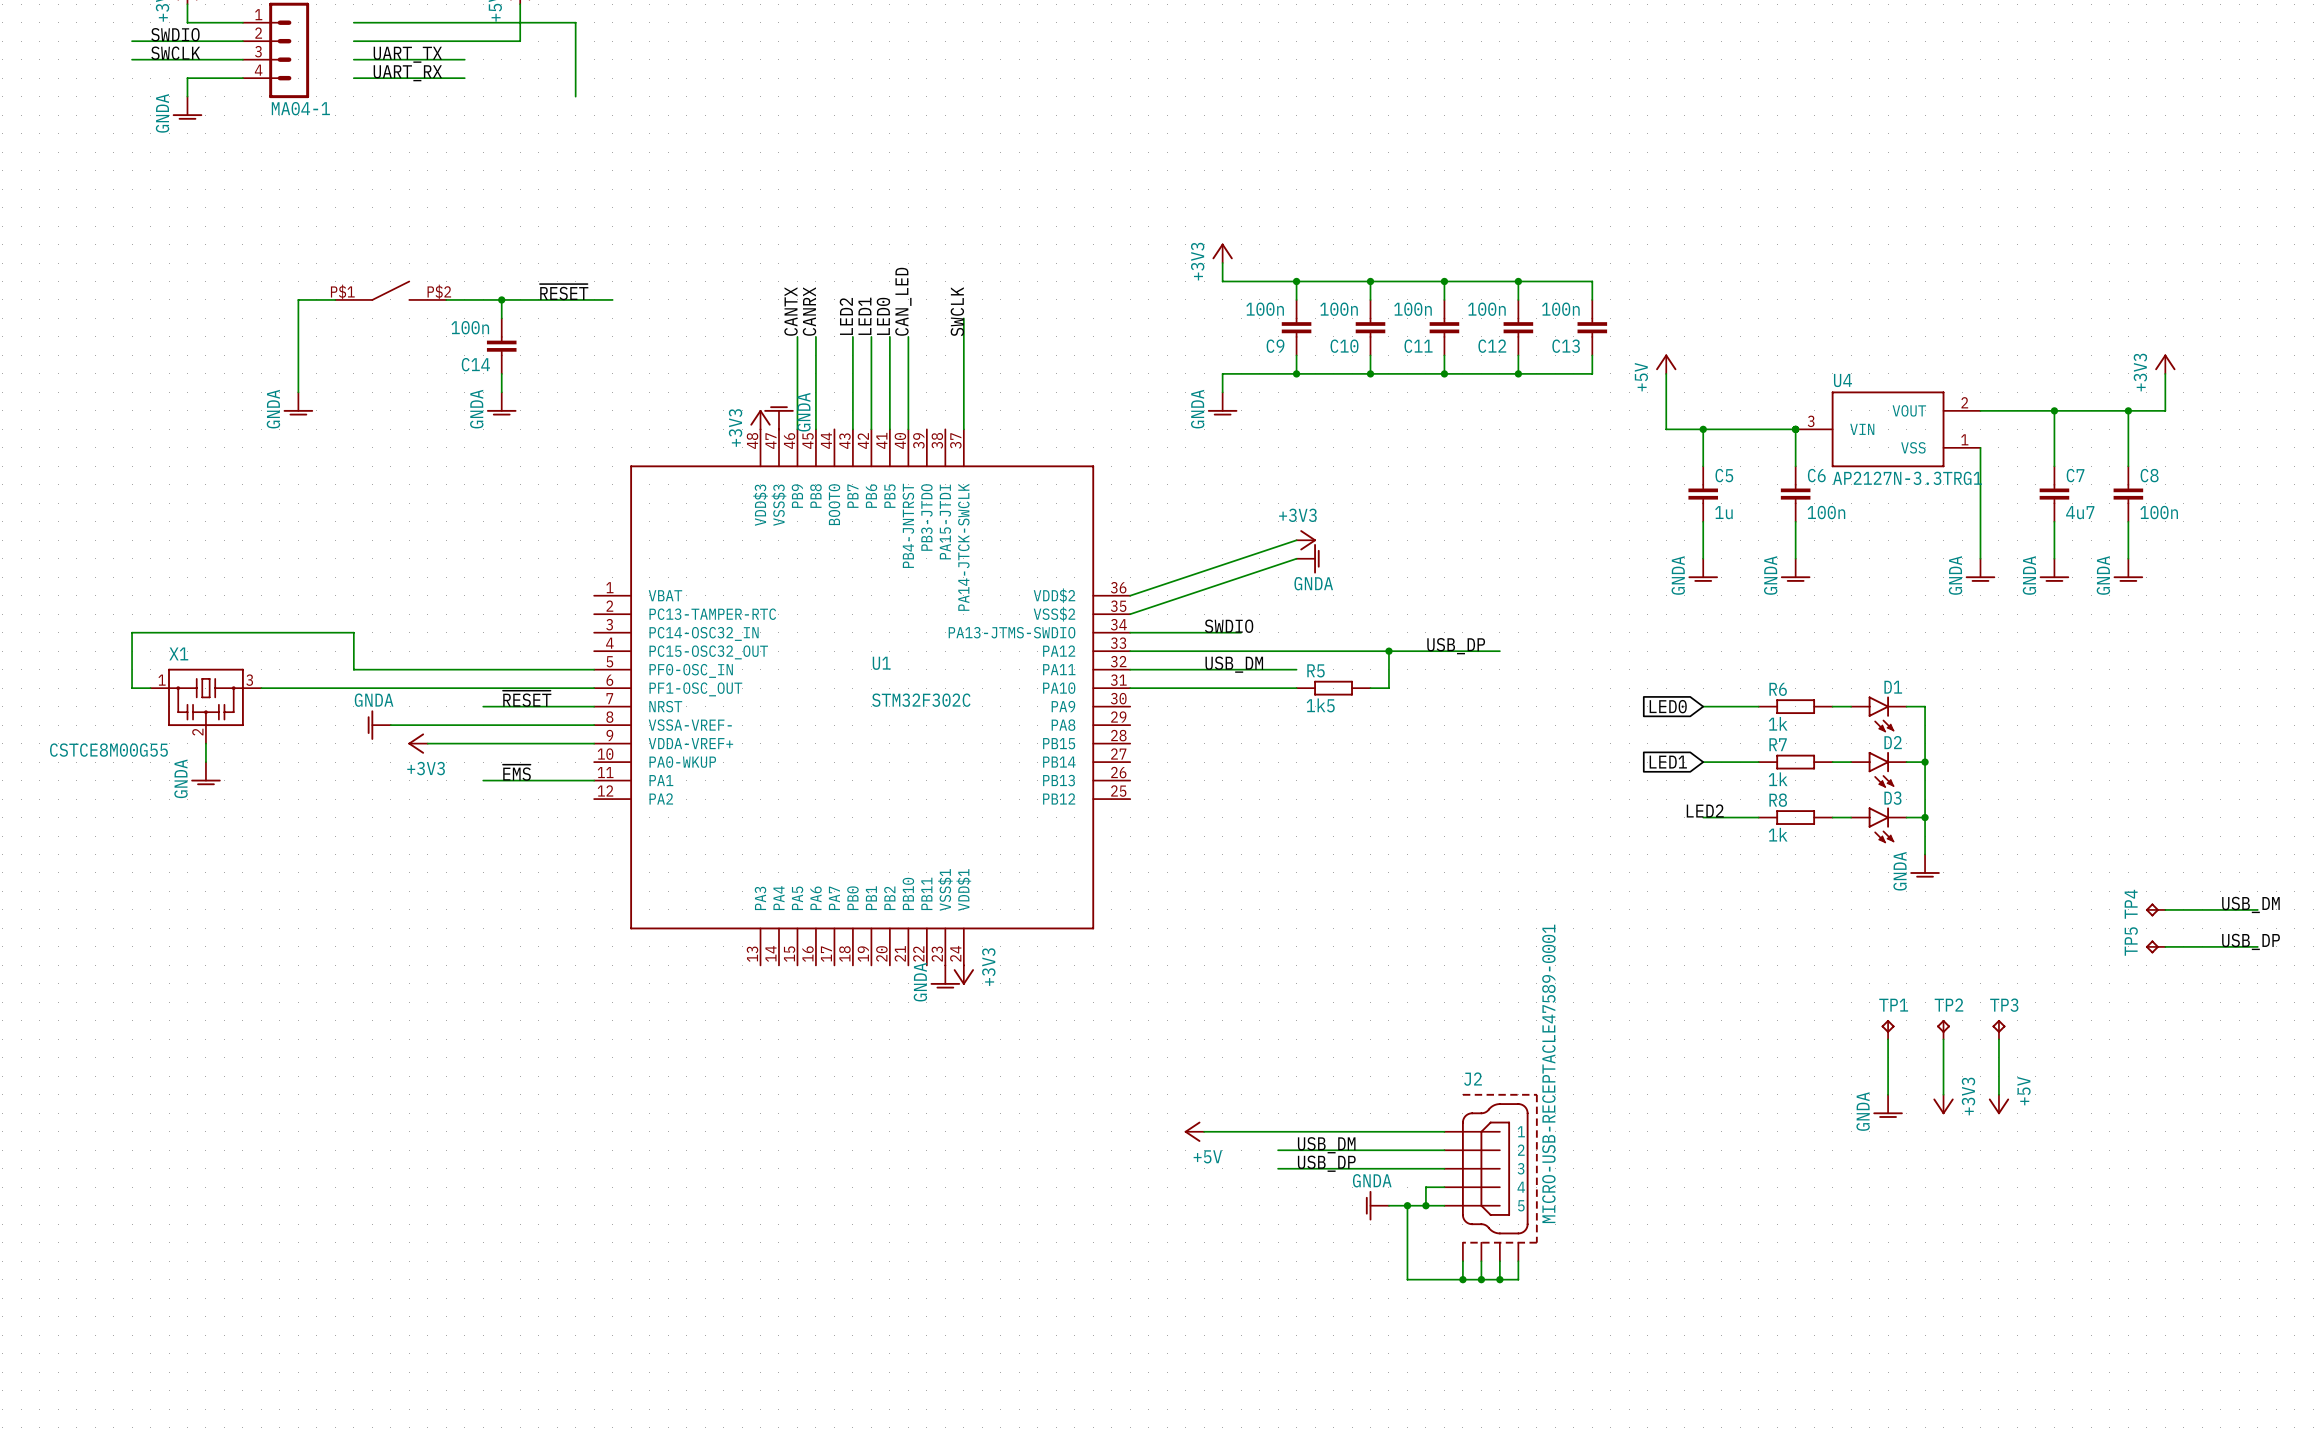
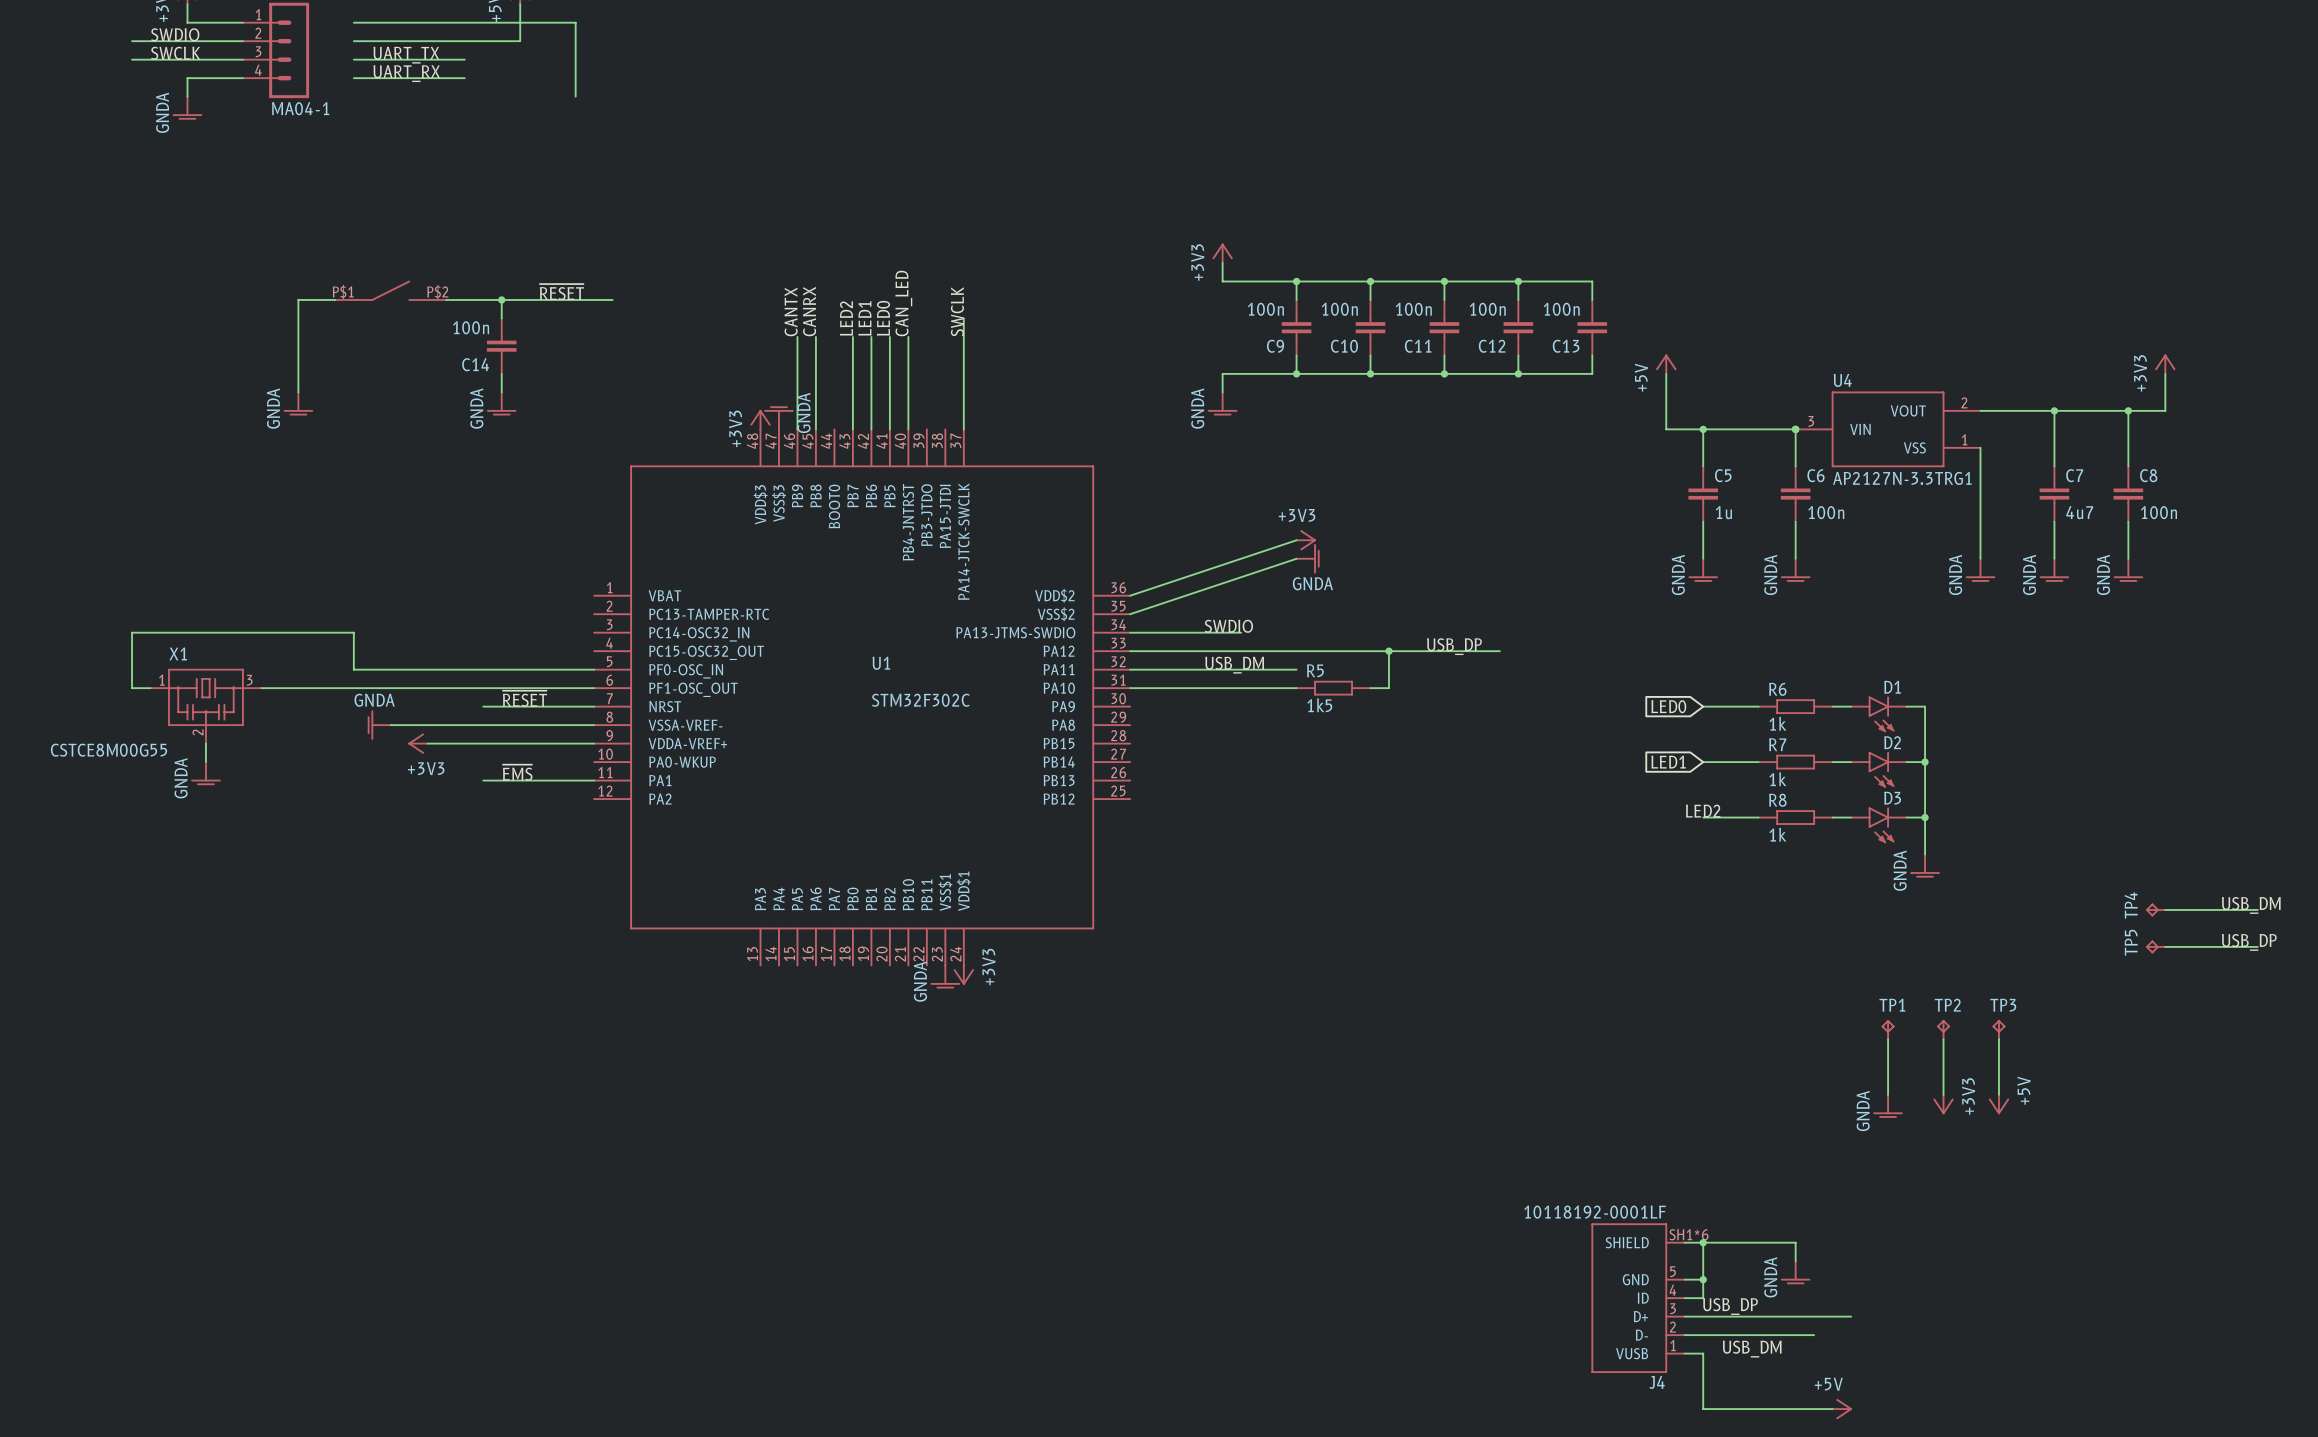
power symbol: +5V (1194, 1131) -> none
wire: (1204, 1131) (1444, 1131) -> none
label: USB_DM (1326, 1145) -> none
wire: (1278, 1150) (1444, 1150) -> none
label: USB_DP (1326, 1163) -> none
wire: (1278, 1168) (1444, 1168) -> none
J2: MICRO-USB-RECEPTACLE47589-0001 (1491, 1177) -> none
wire: (1444, 1187) (1425, 1187) (1425, 1205) -> none
power symbol: GNDA (1377, 1205) -> none
wire: (1388, 1205) (1444, 1205) -> none
wire: (1407, 1205) (1407, 1279) (1518, 1279) (1518, 1261) -> none
junction: (1407, 1205) -> none
junction: (1425, 1205) -> none
wire: none -> (1684, 1242) (1795, 1242) (1795, 1261)
wire: none -> (1703, 1242) (1703, 1298) (1684, 1298)
junction: none -> (1703, 1242)
wire: (1462, 1261) (1462, 1279) -> none
wire: (1481, 1261) (1481, 1279) -> none
wire: (1499, 1261) (1499, 1279) -> none
power symbol: none -> GNDA (1795, 1272)
junction: (1462, 1279) -> none
junction: (1481, 1279) -> none
junction: (1499, 1279) -> none
wire: none -> (1684, 1279) (1703, 1279)
junction: none -> (1703, 1279)
J4: none -> 10118192-0001LF (1638, 1298)
label: none -> USB_DP (1730, 1306)
wire: none -> (1684, 1316) (1851, 1316)
wire: none -> (1684, 1335) (1814, 1335)
label: none -> USB_DM (1752, 1349)
wire: none -> (1684, 1353) (1703, 1353) (1703, 1409) (1832, 1409)
power symbol: none -> +5V (1842, 1409)

